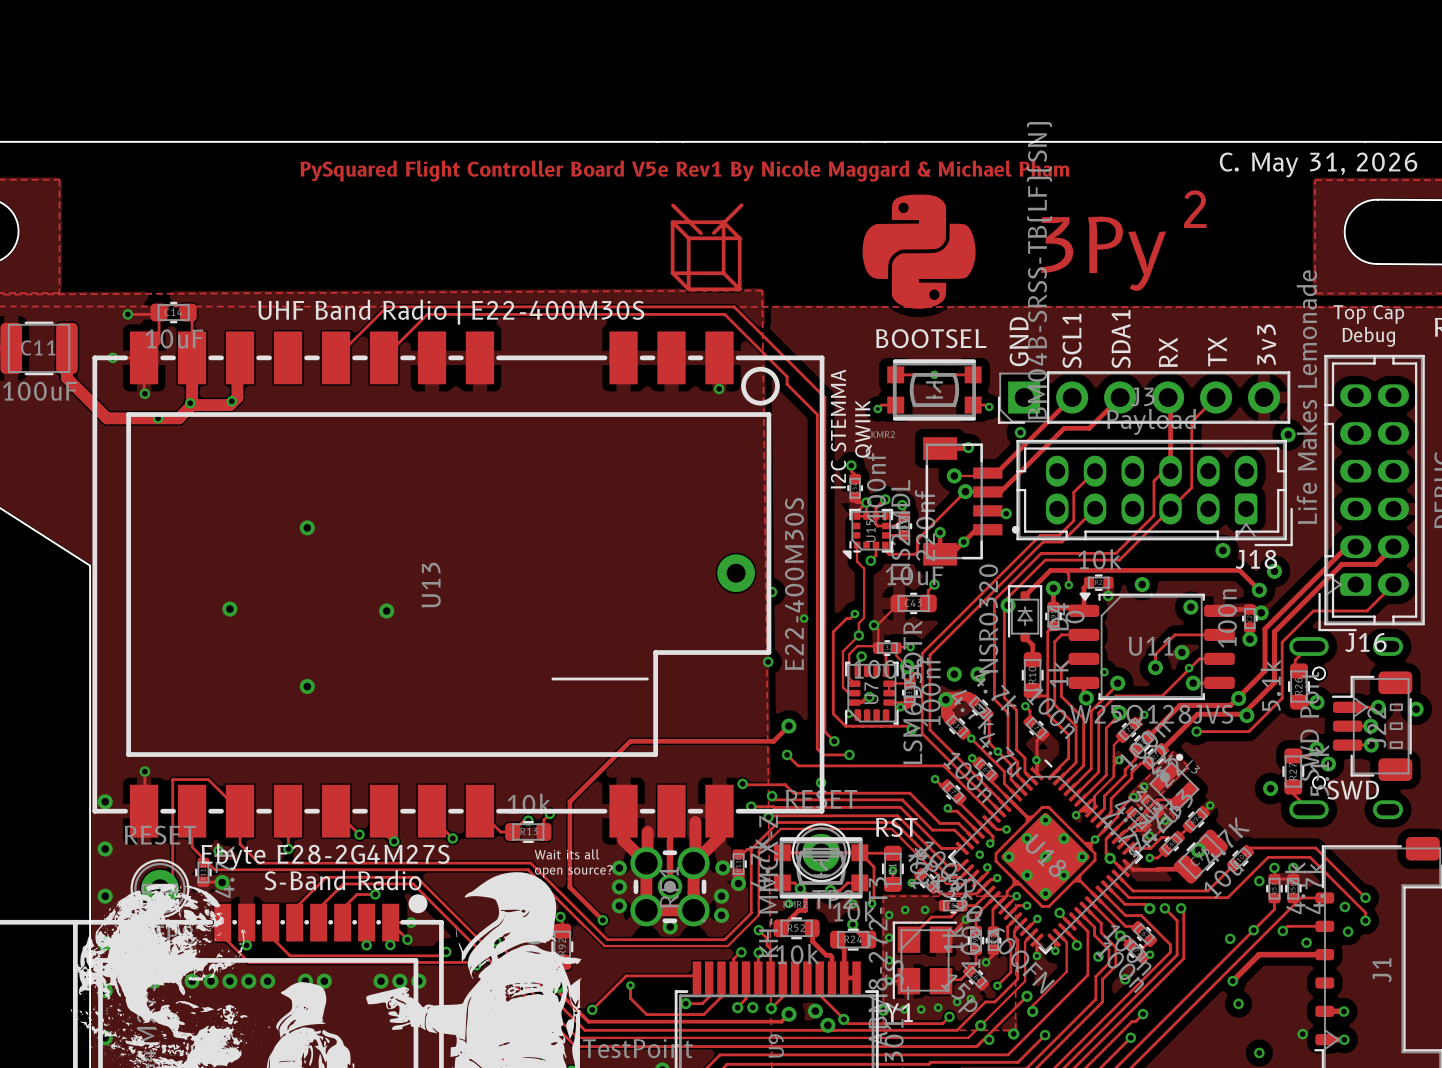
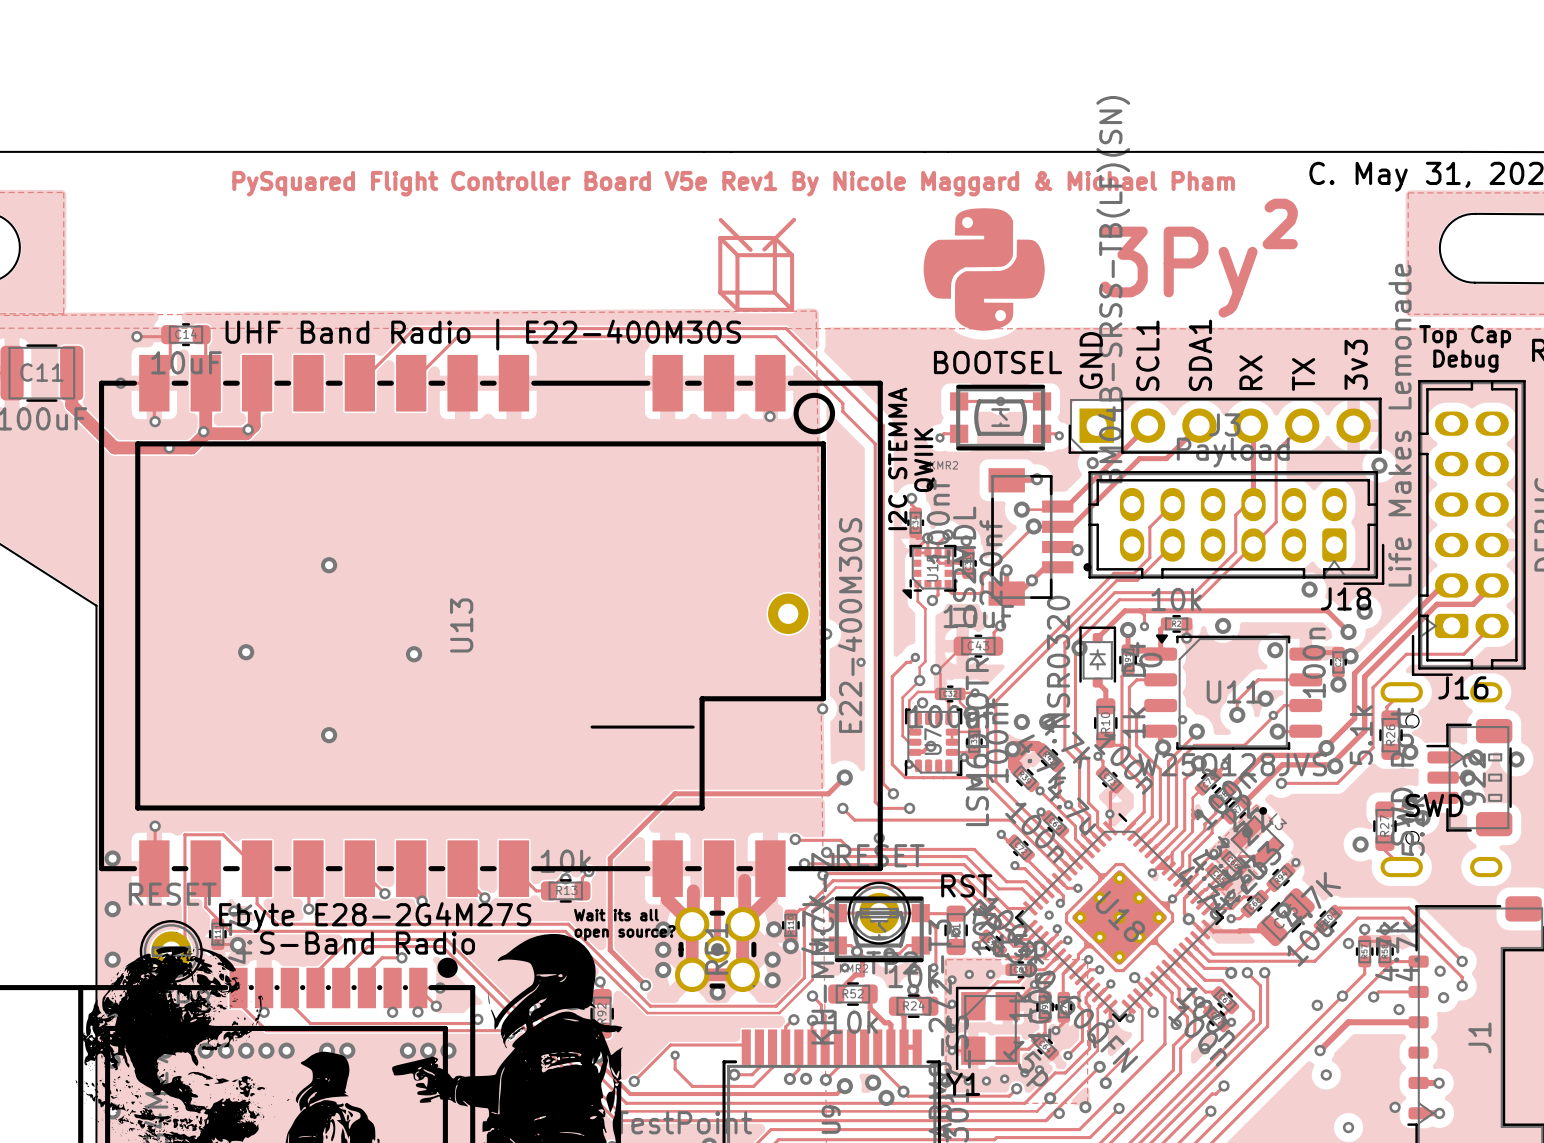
text position: SWD (1353, 790) -> SWD (1434, 805)

